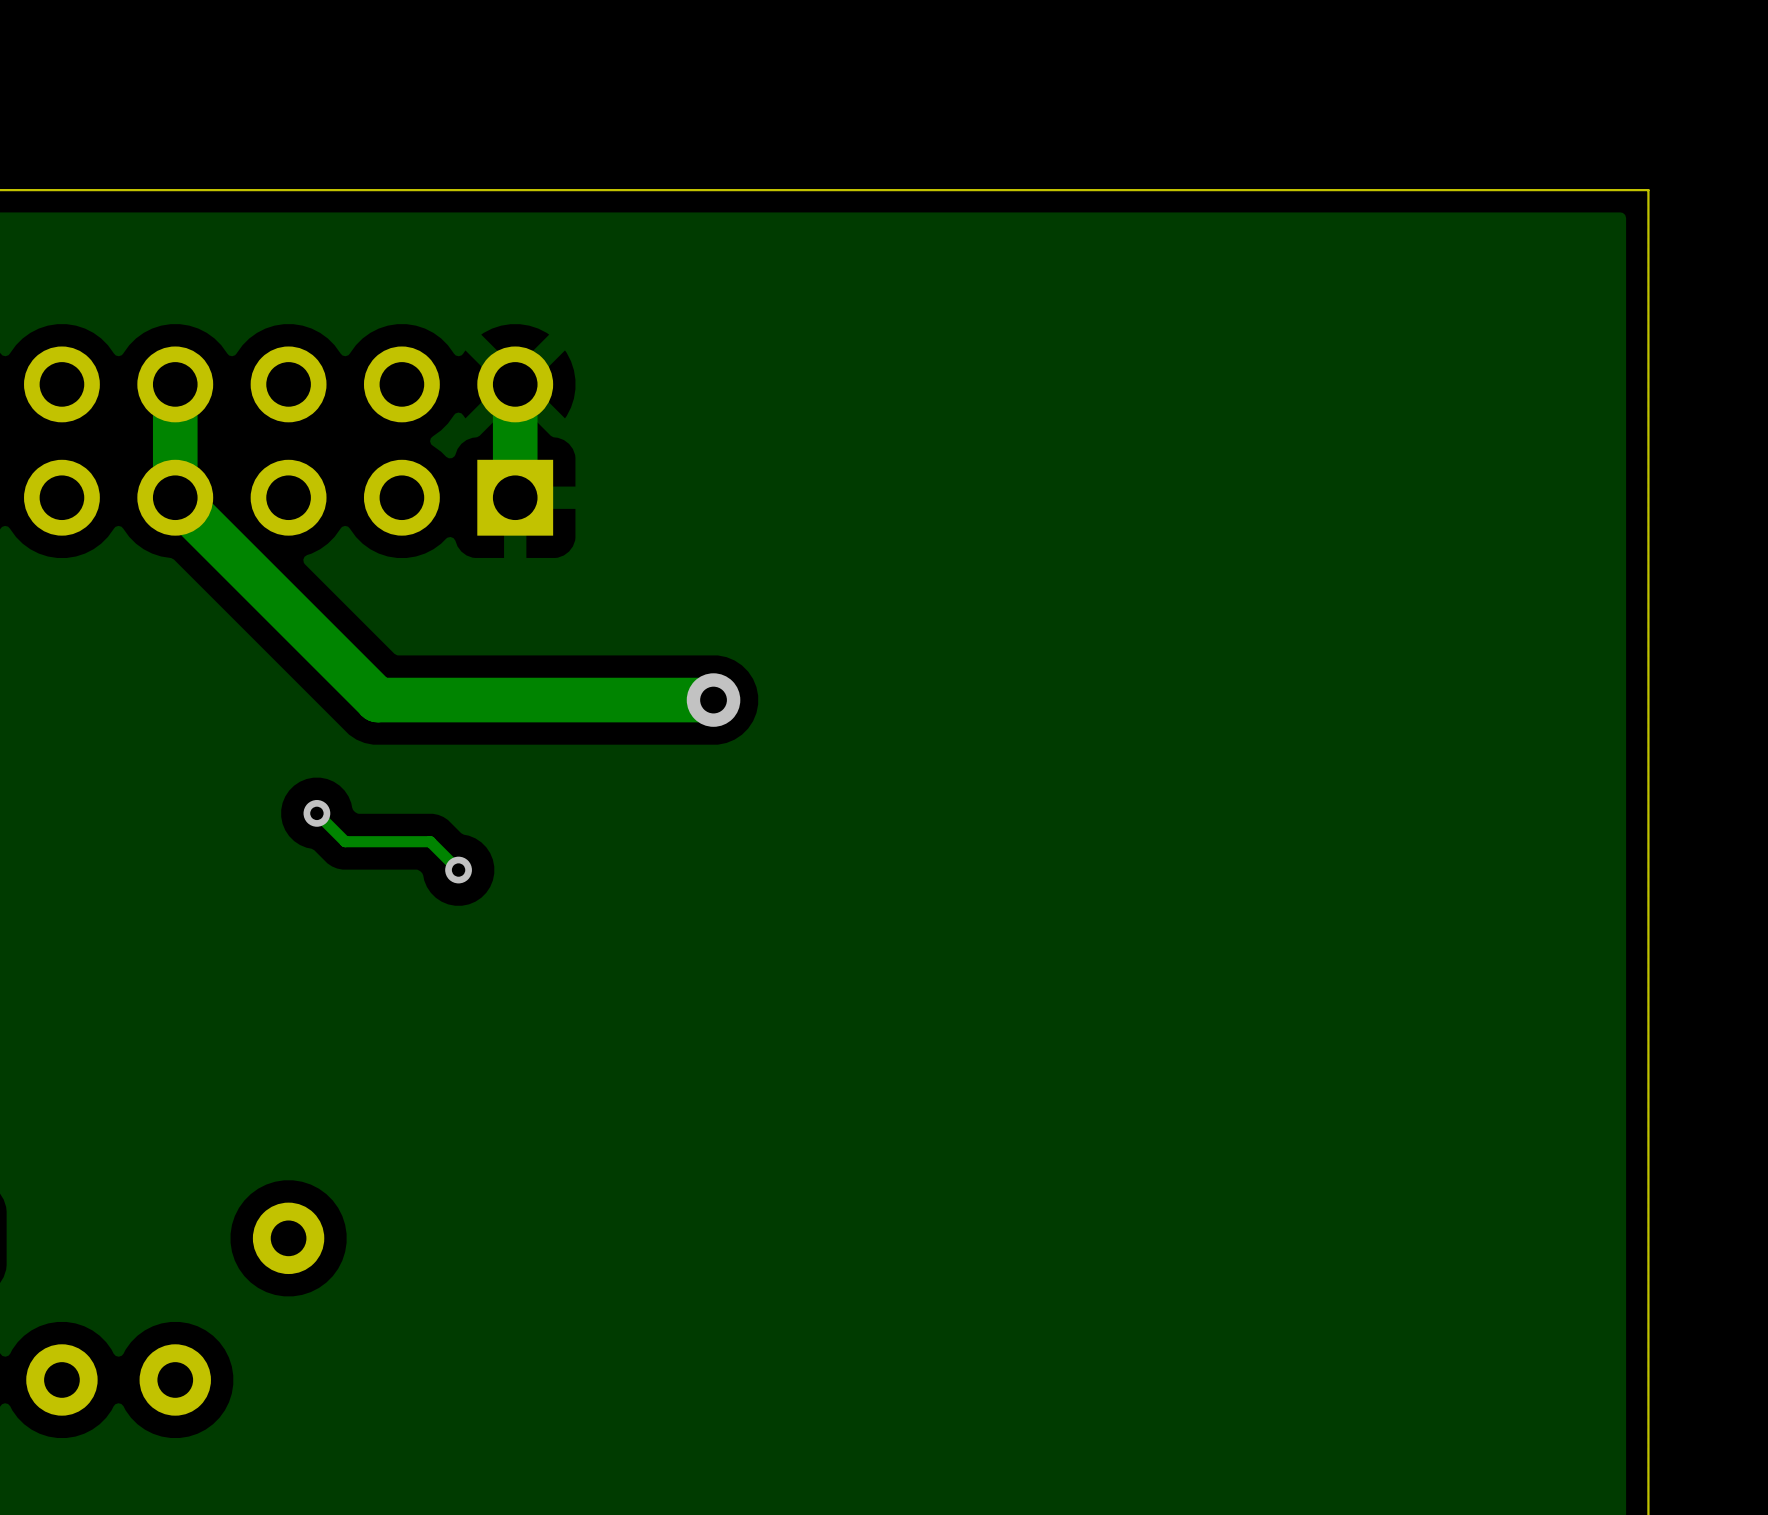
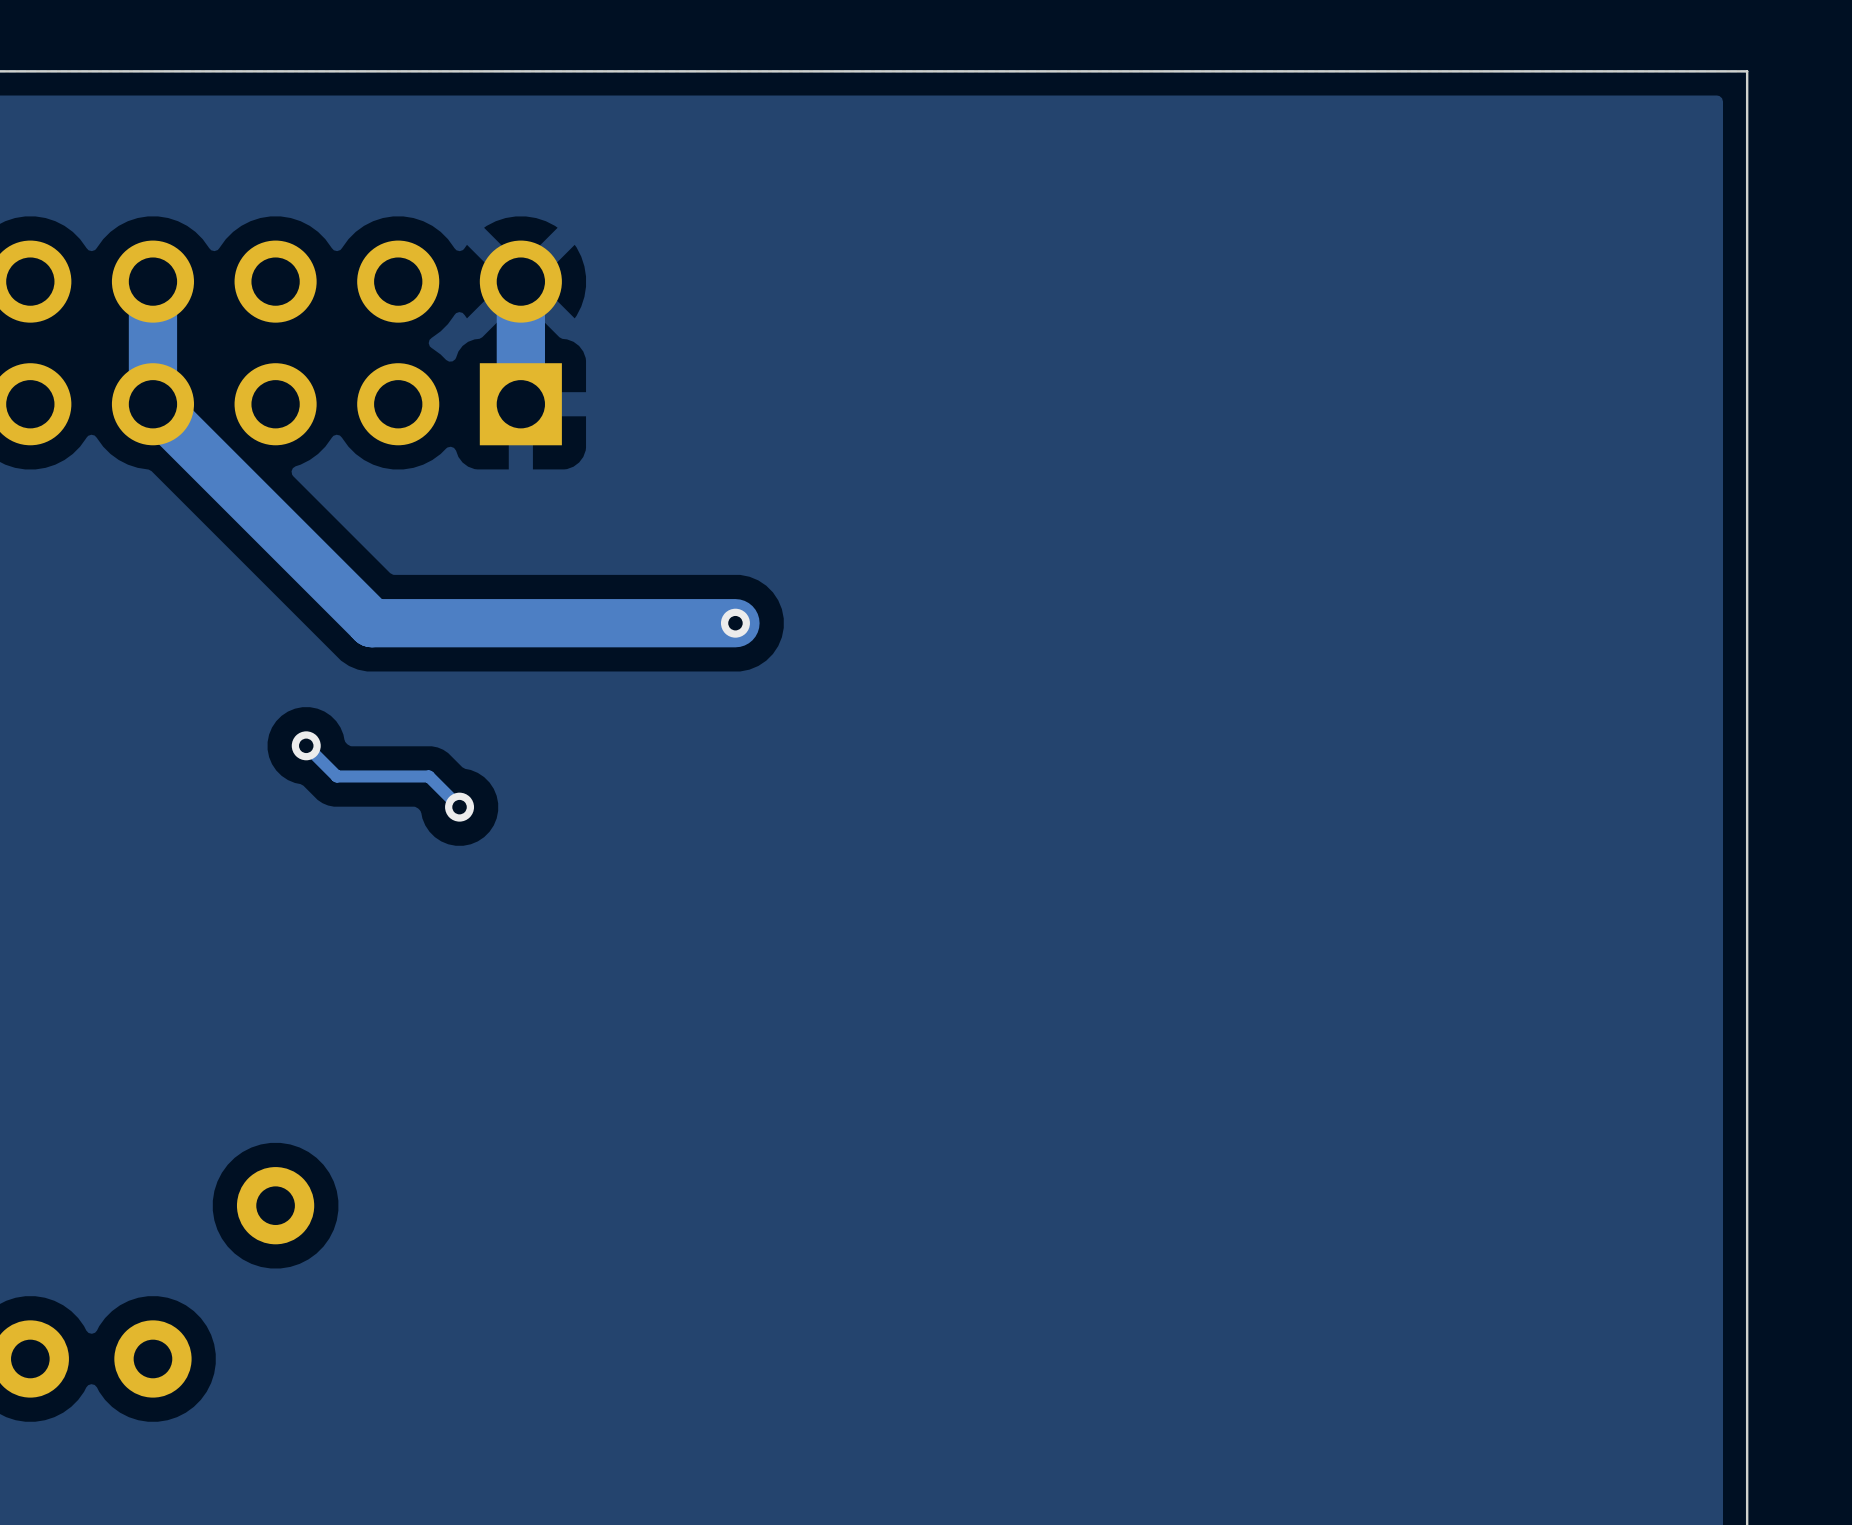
via size: [686, 673, 741, 727] -> [720, 608, 750, 638]

